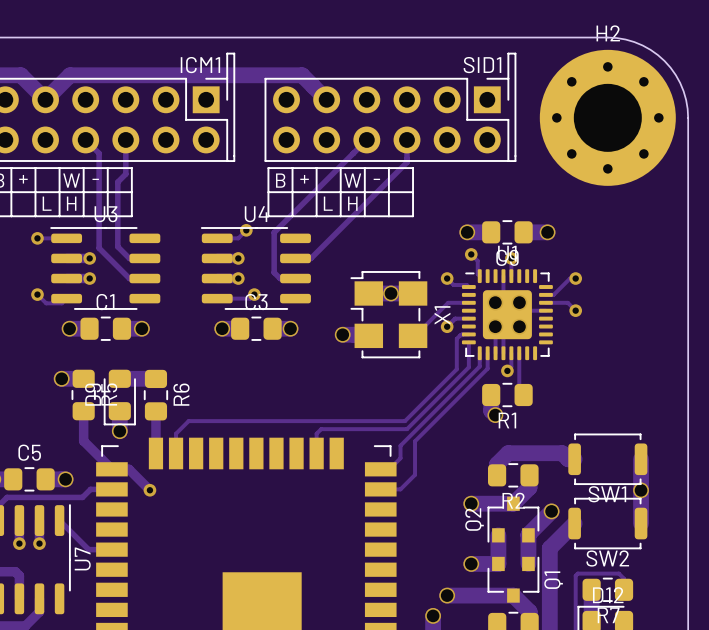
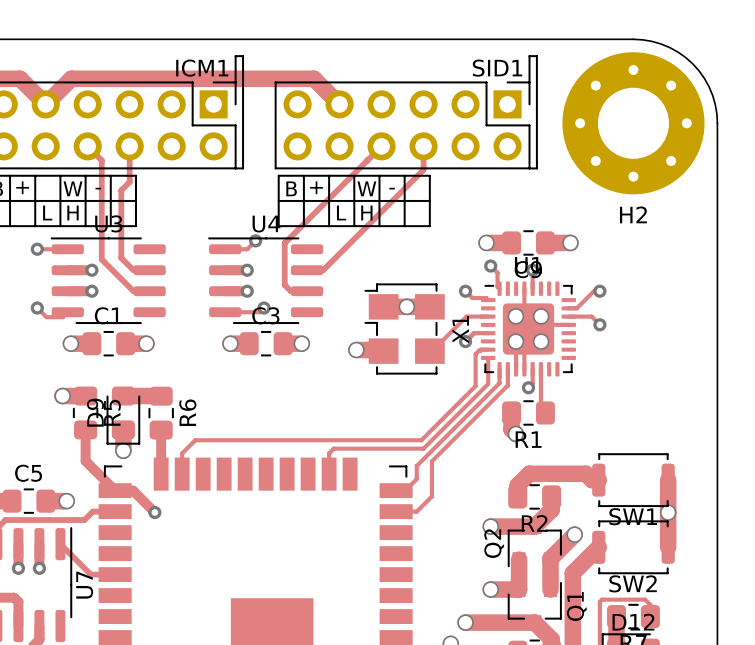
H2 name position: H2 (608, 33) -> H2 (633, 214)

